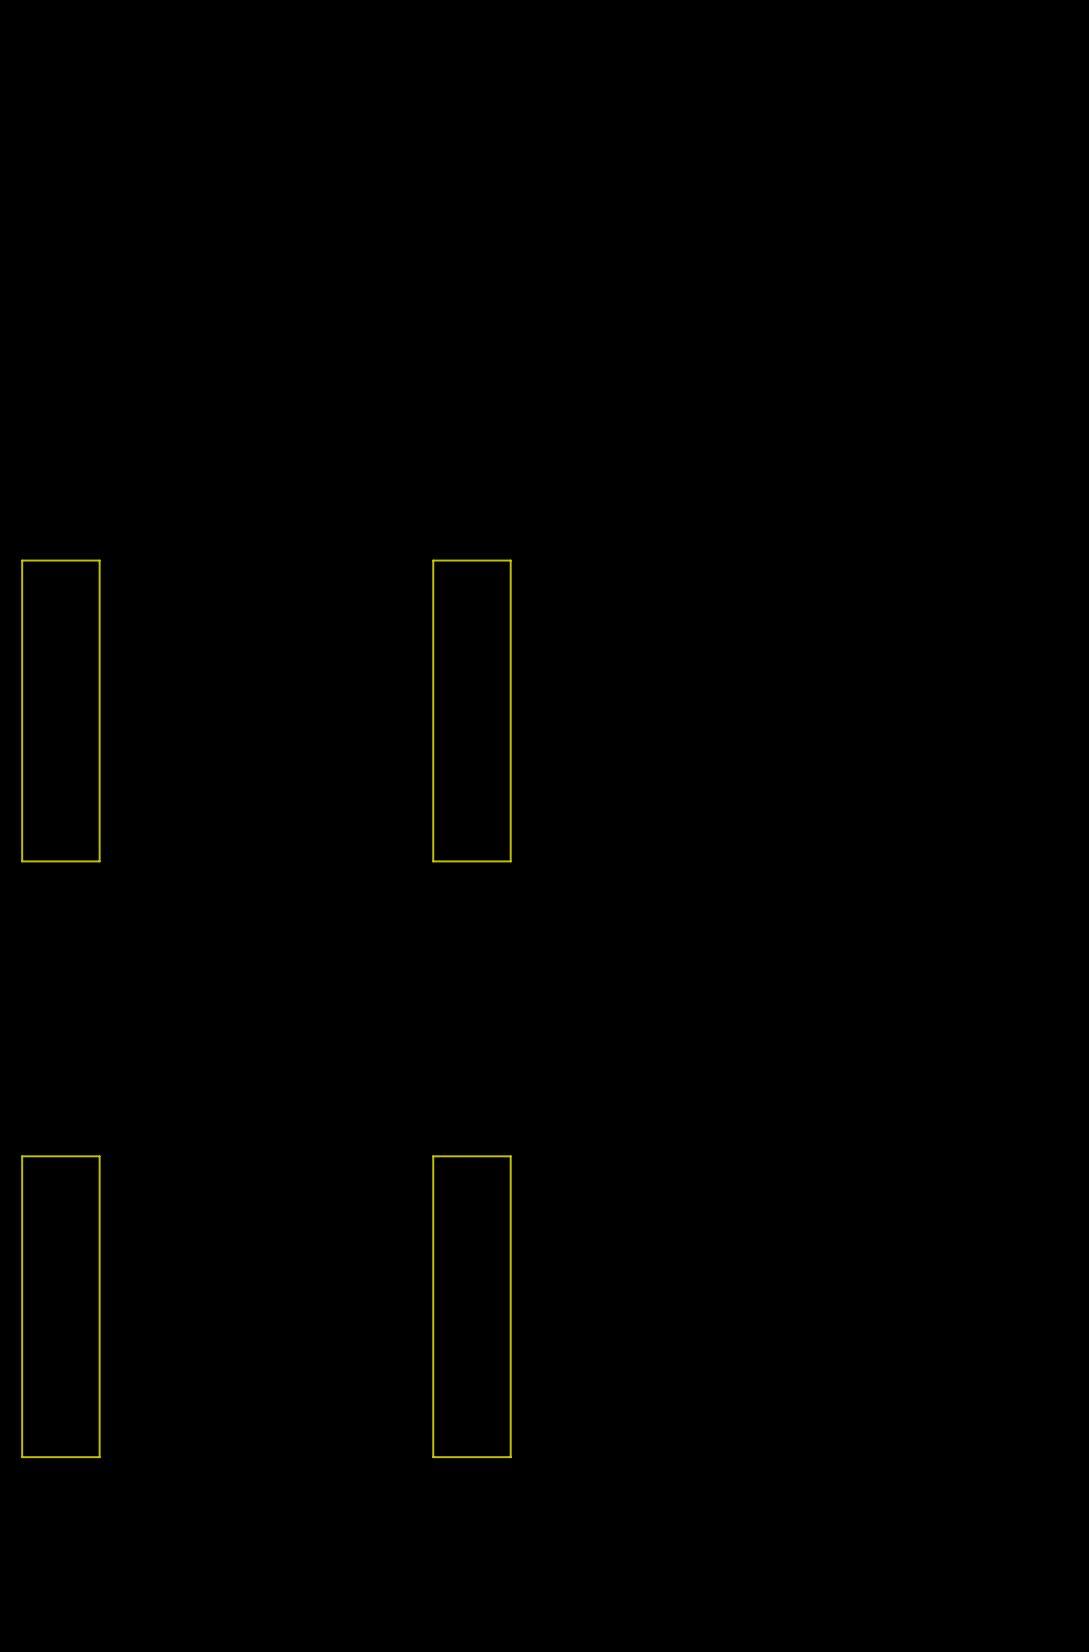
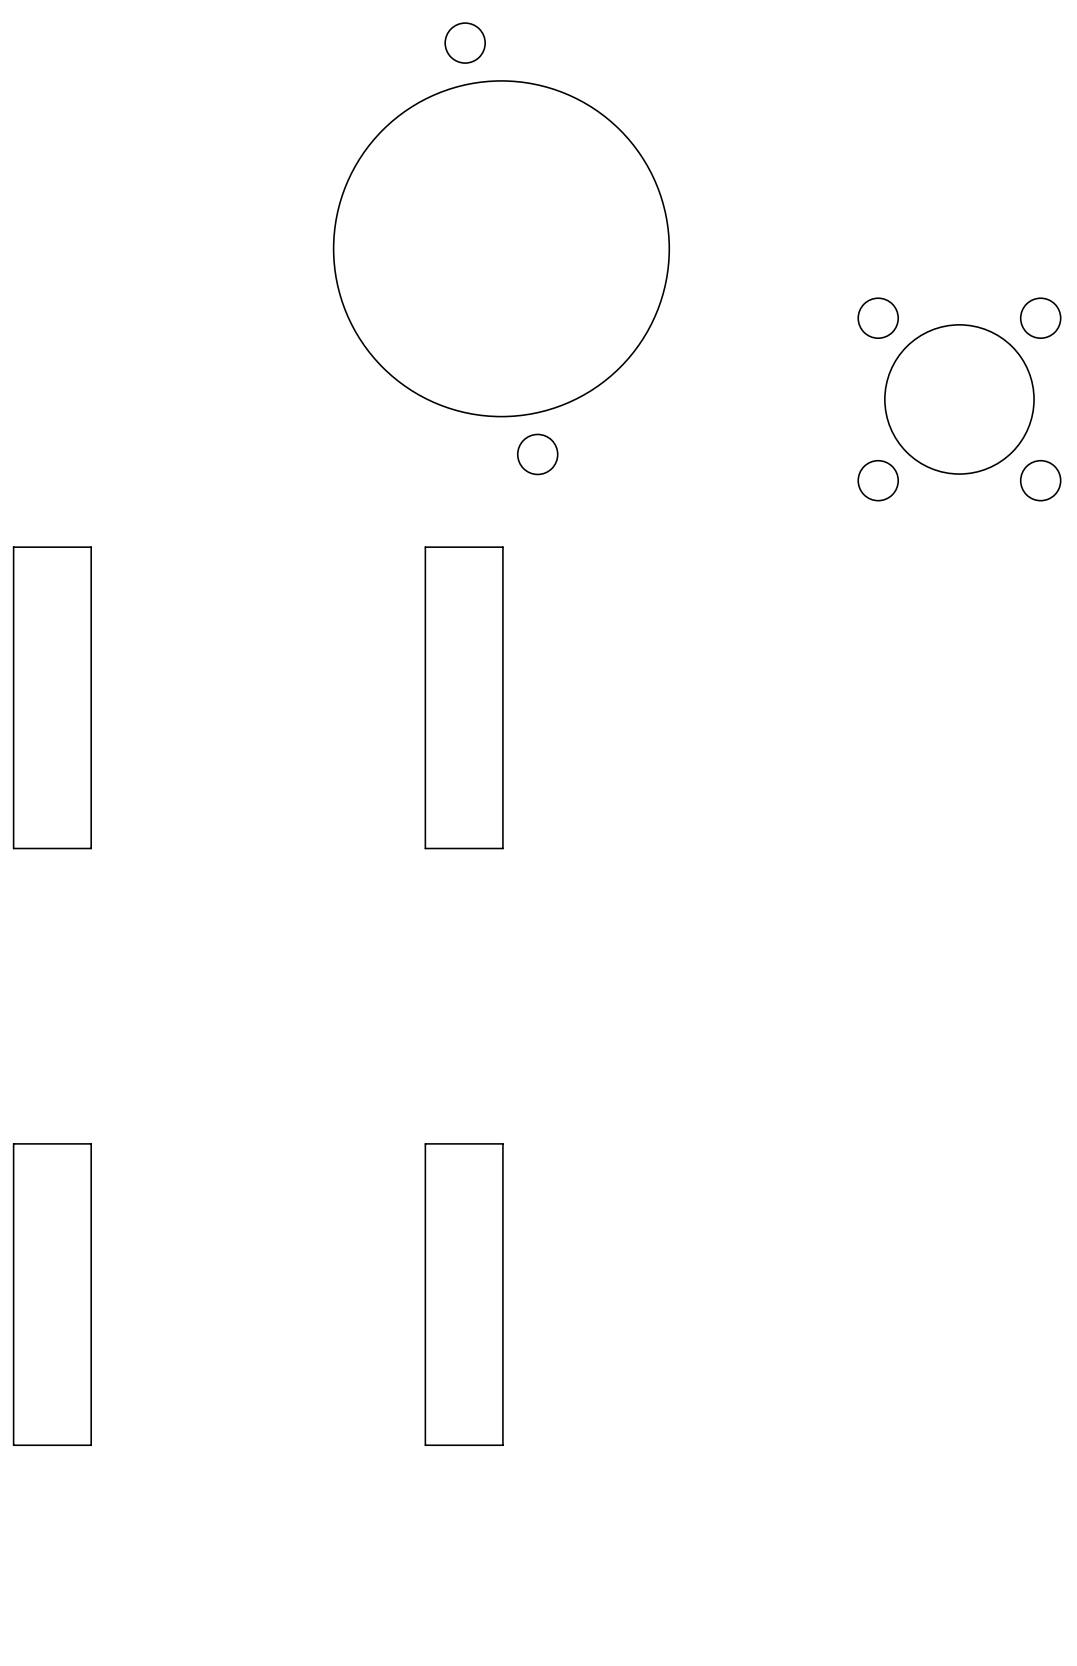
drawing: none -> [333, 22, 670, 475]
drawing: none -> [858, 298, 1061, 501]

